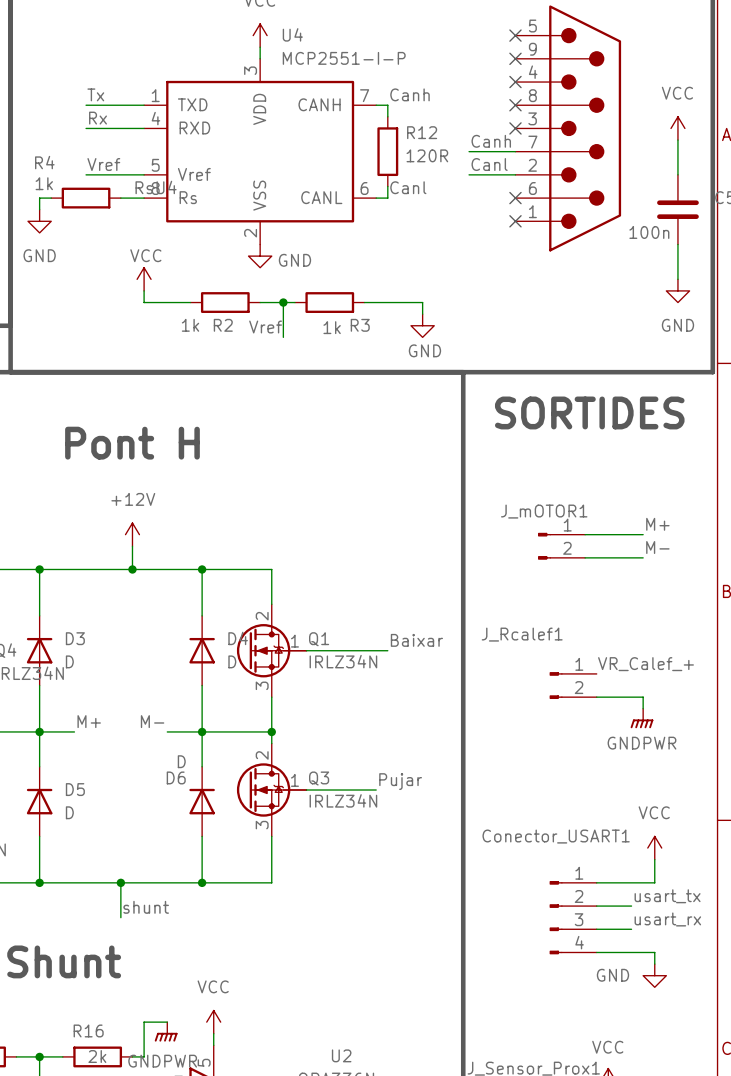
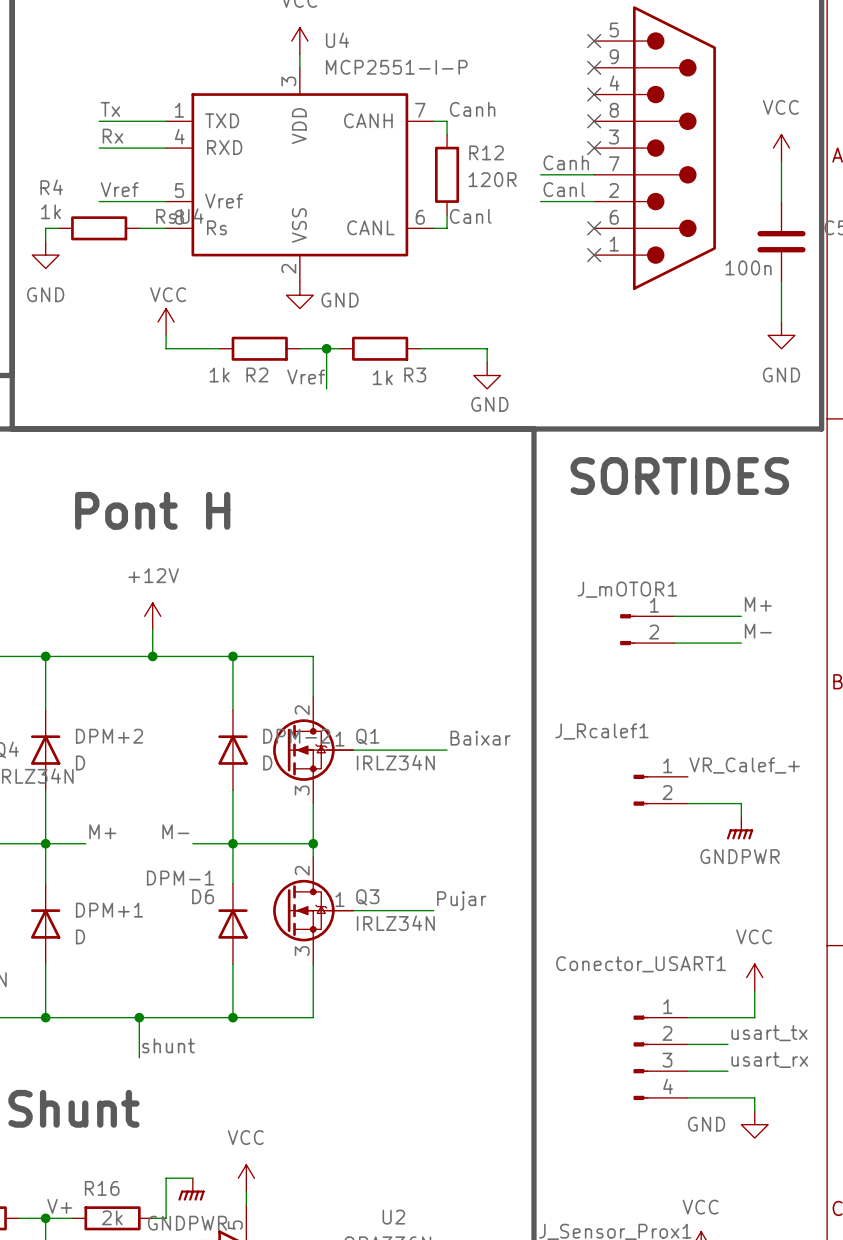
D3 name: D3 (75, 638) -> DPM+2 (109, 736)
D4 name: D4 (238, 638) -> DPM-2 (296, 736)
D6 value: D (181, 761) -> DPM-1 (180, 878)
D5 name: D5 (75, 789) -> DPM+1 (109, 910)
label: none -> V+ (59, 1206)

